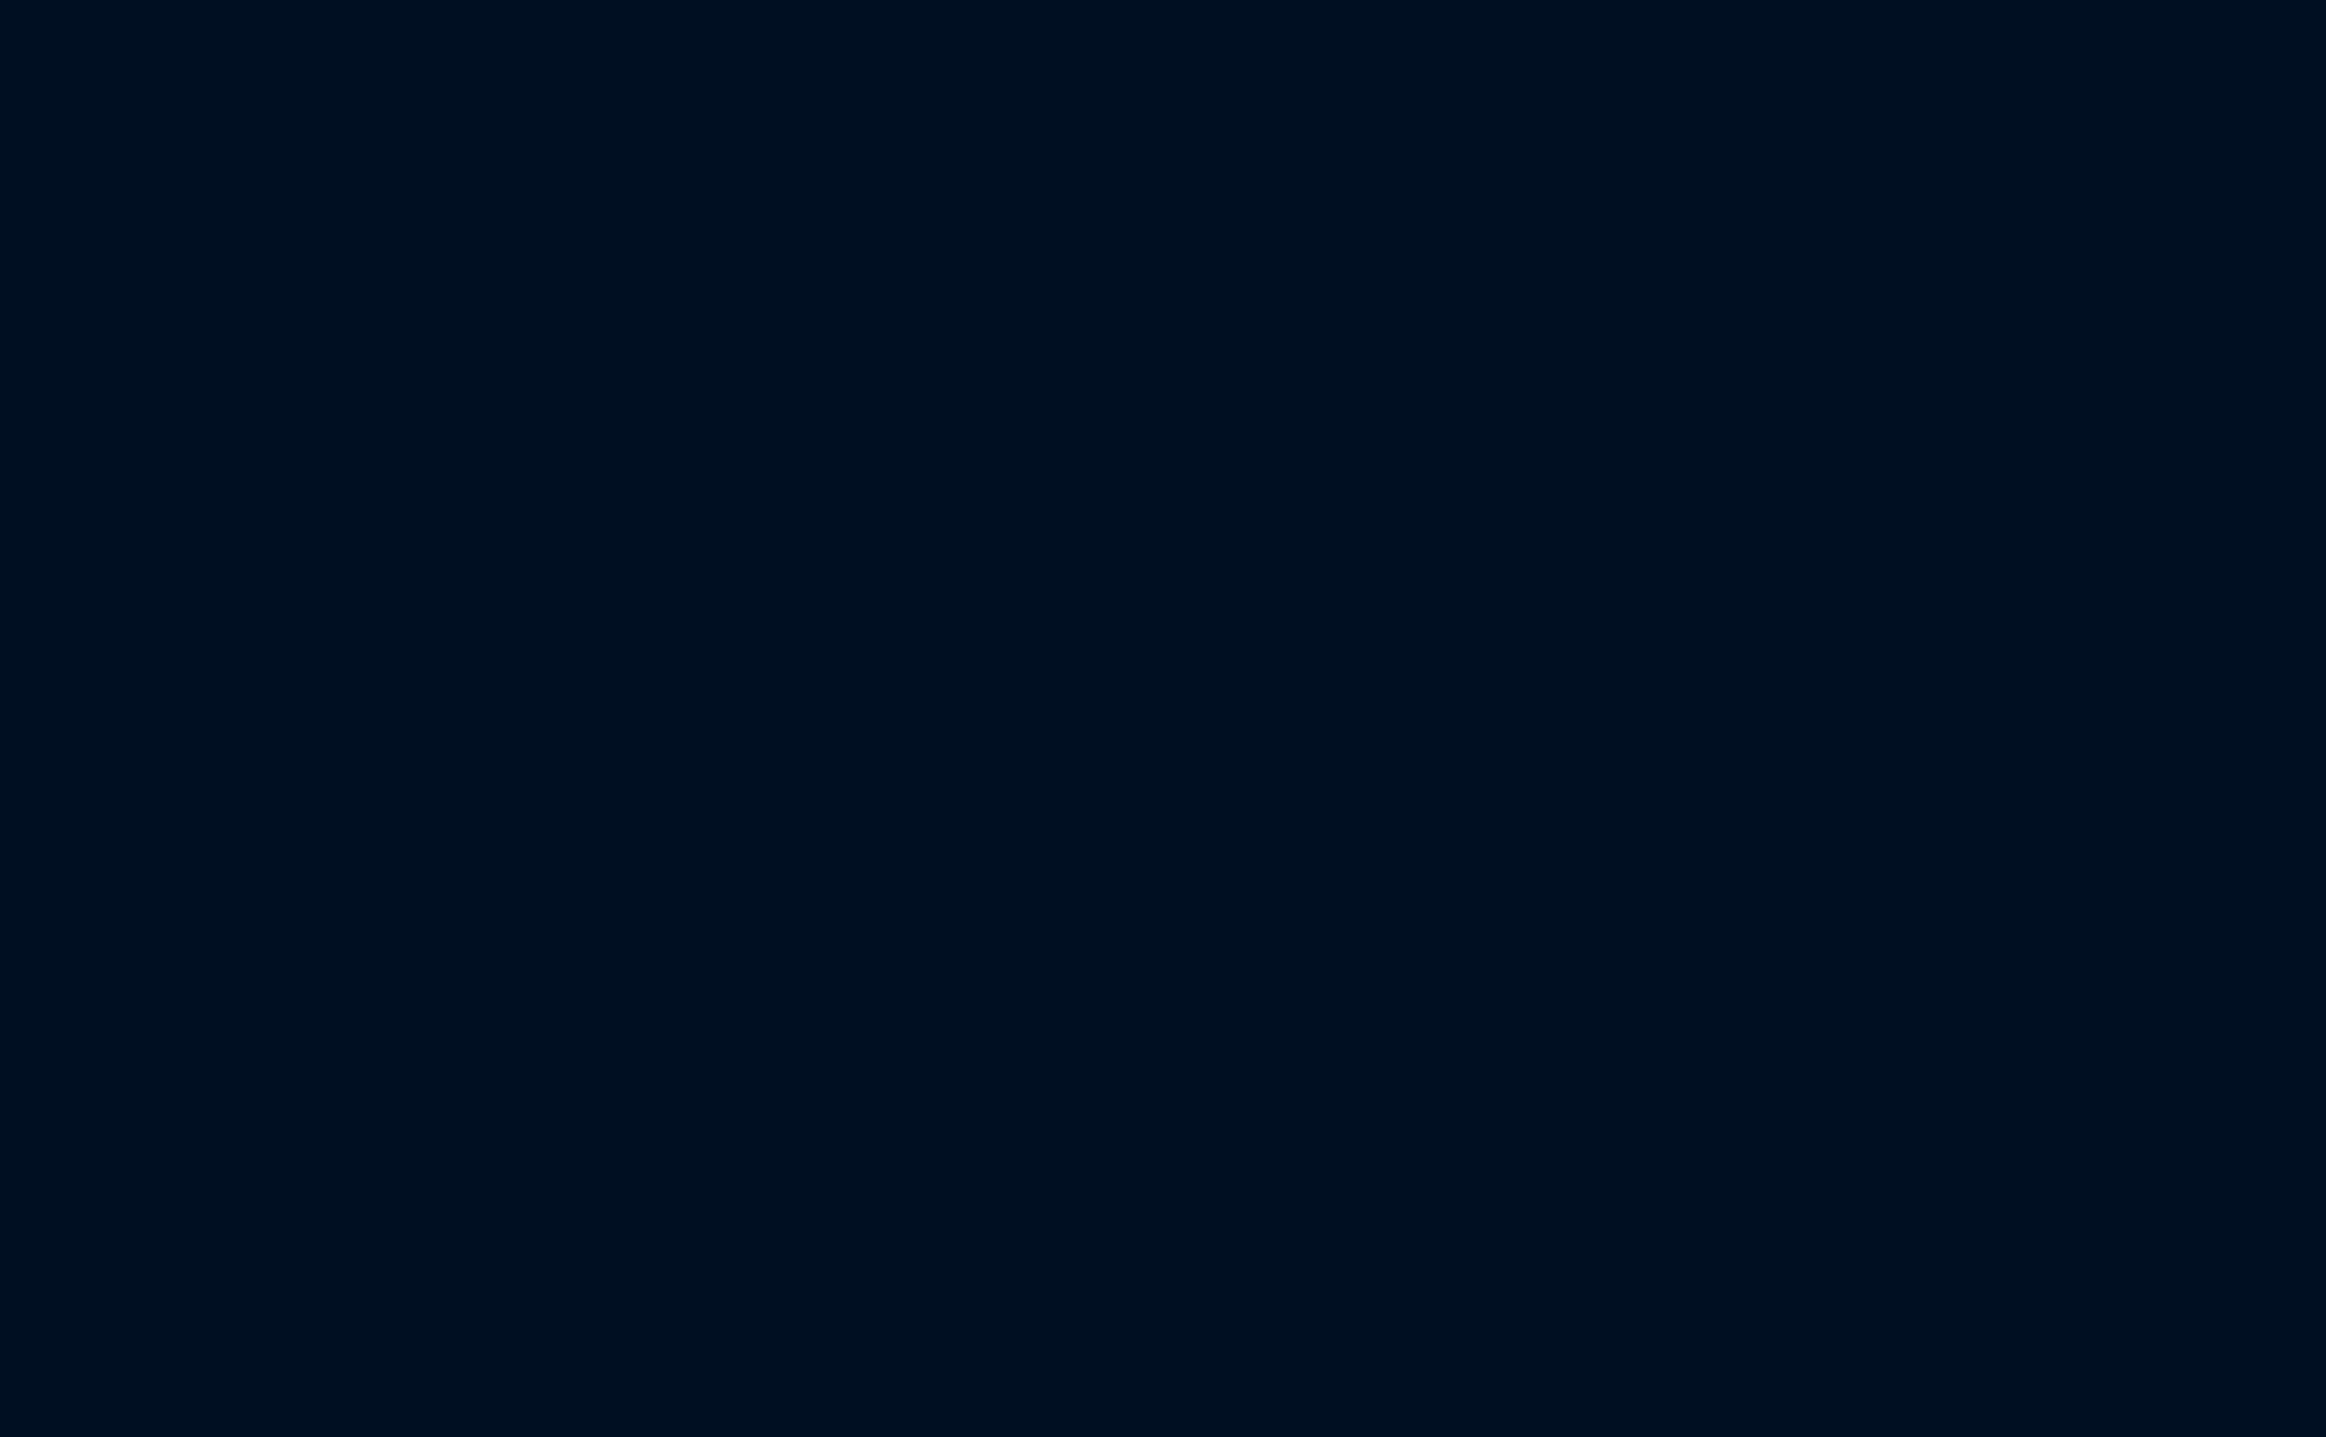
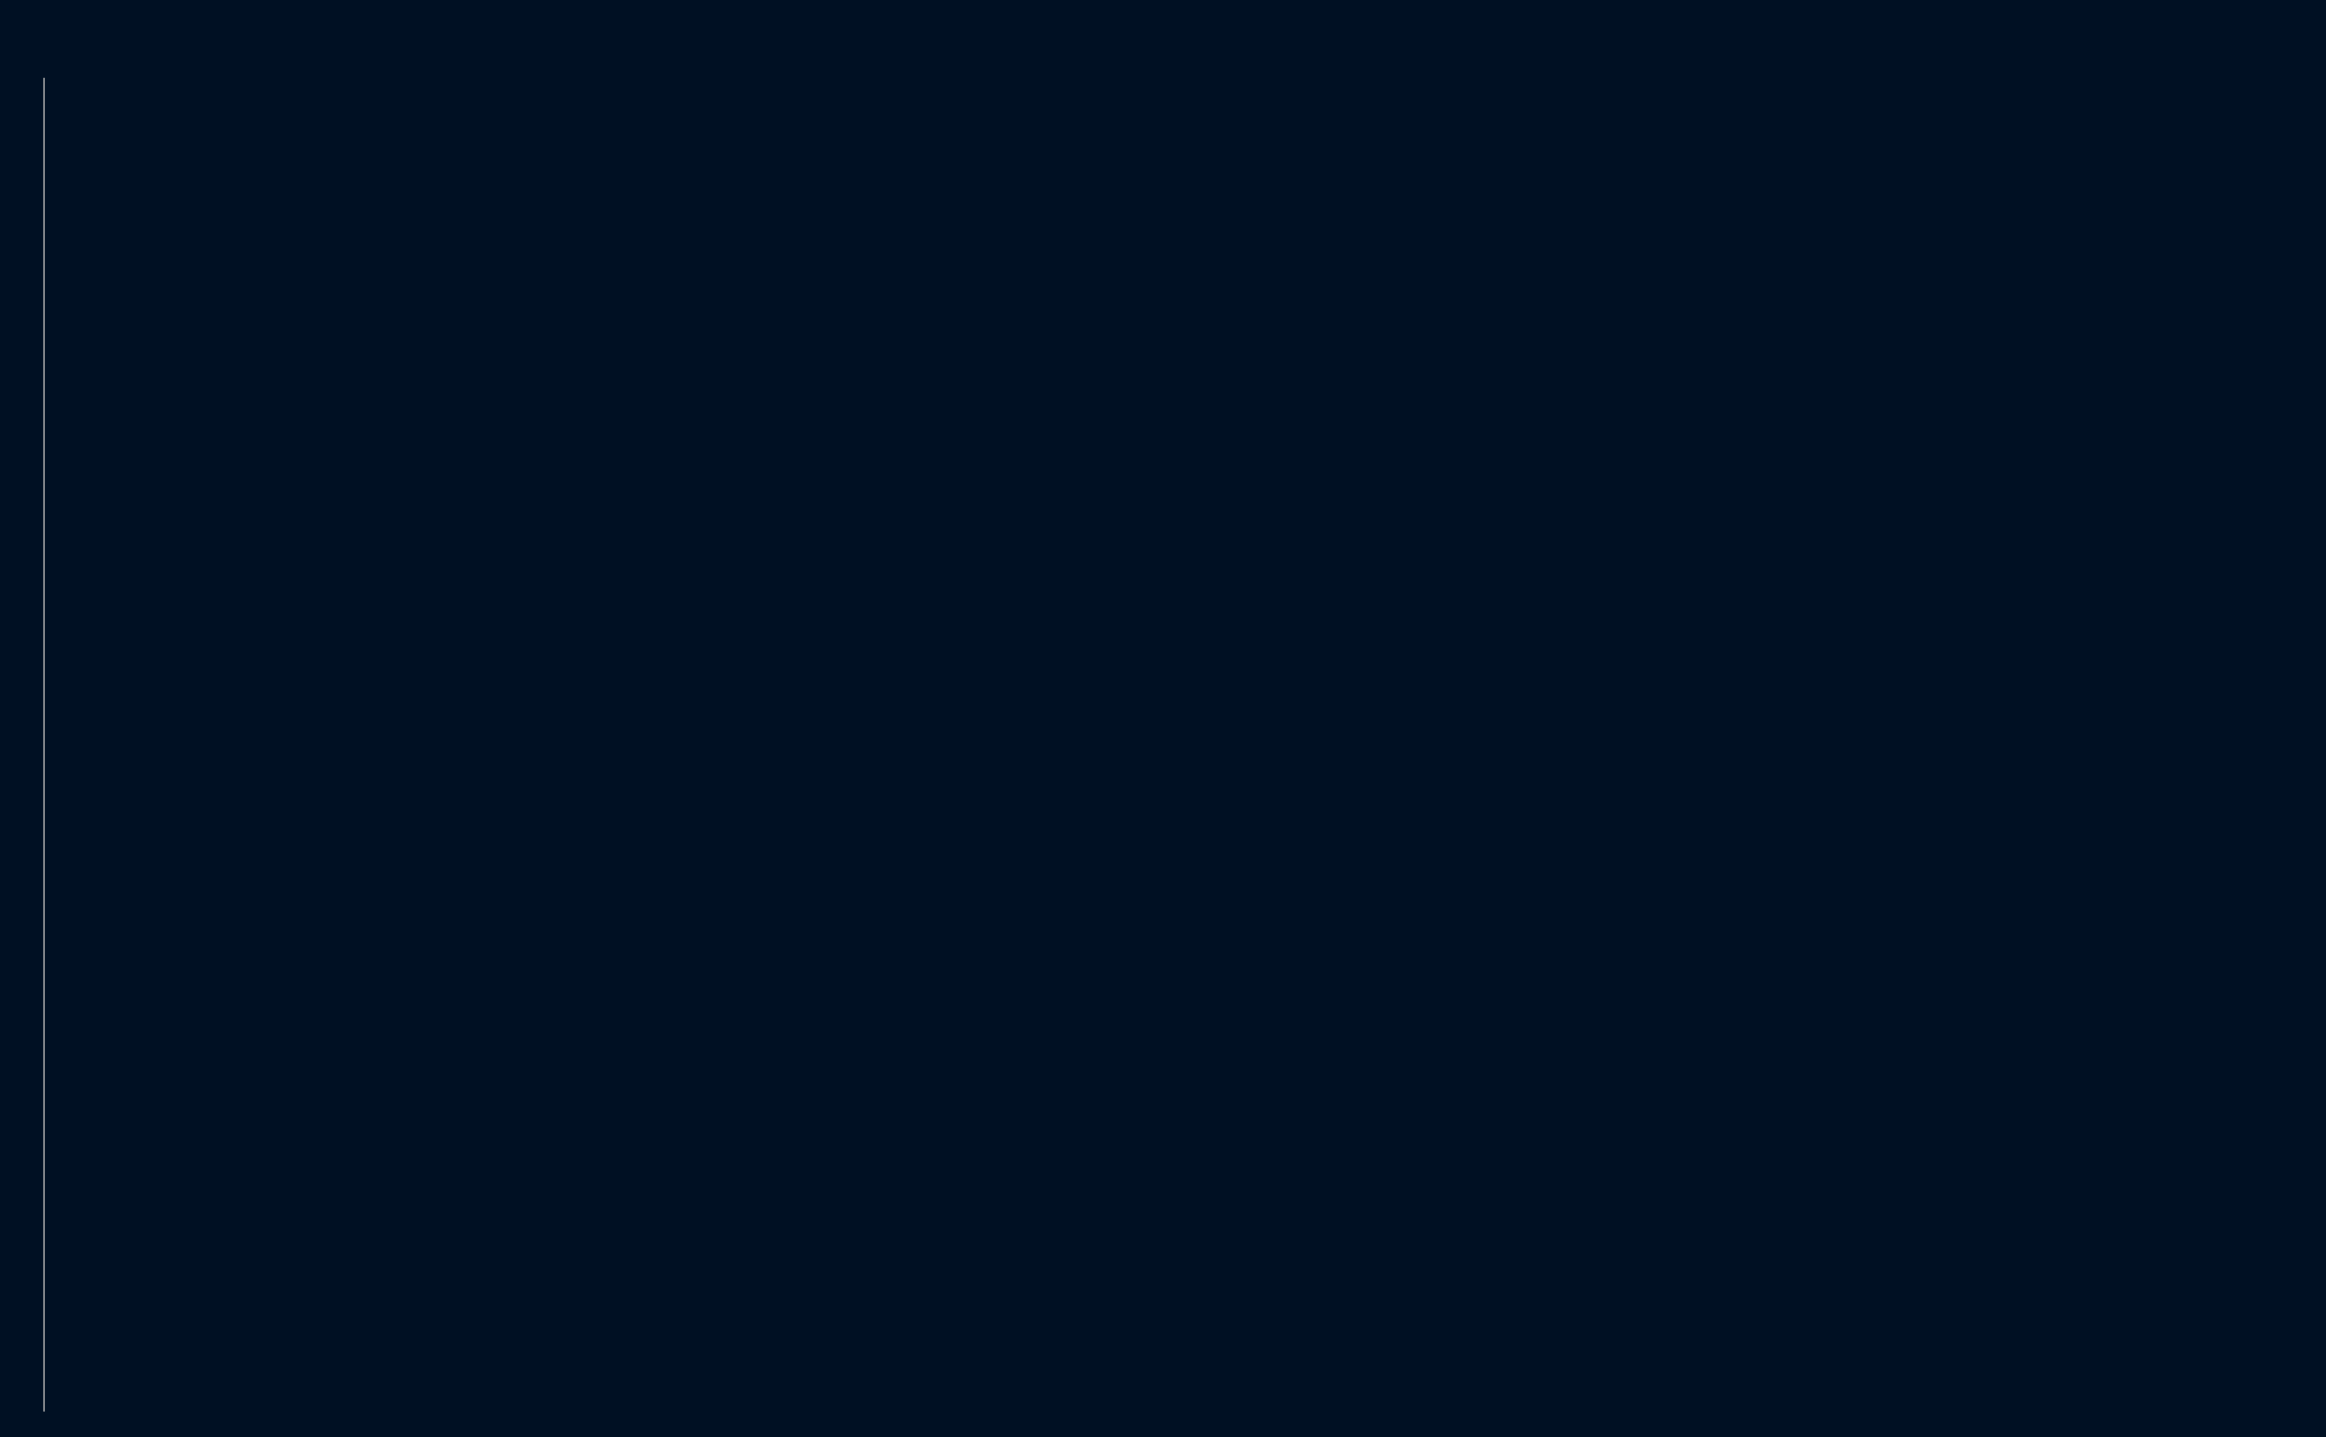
line: none -> (44, 78) (44, 1411)

